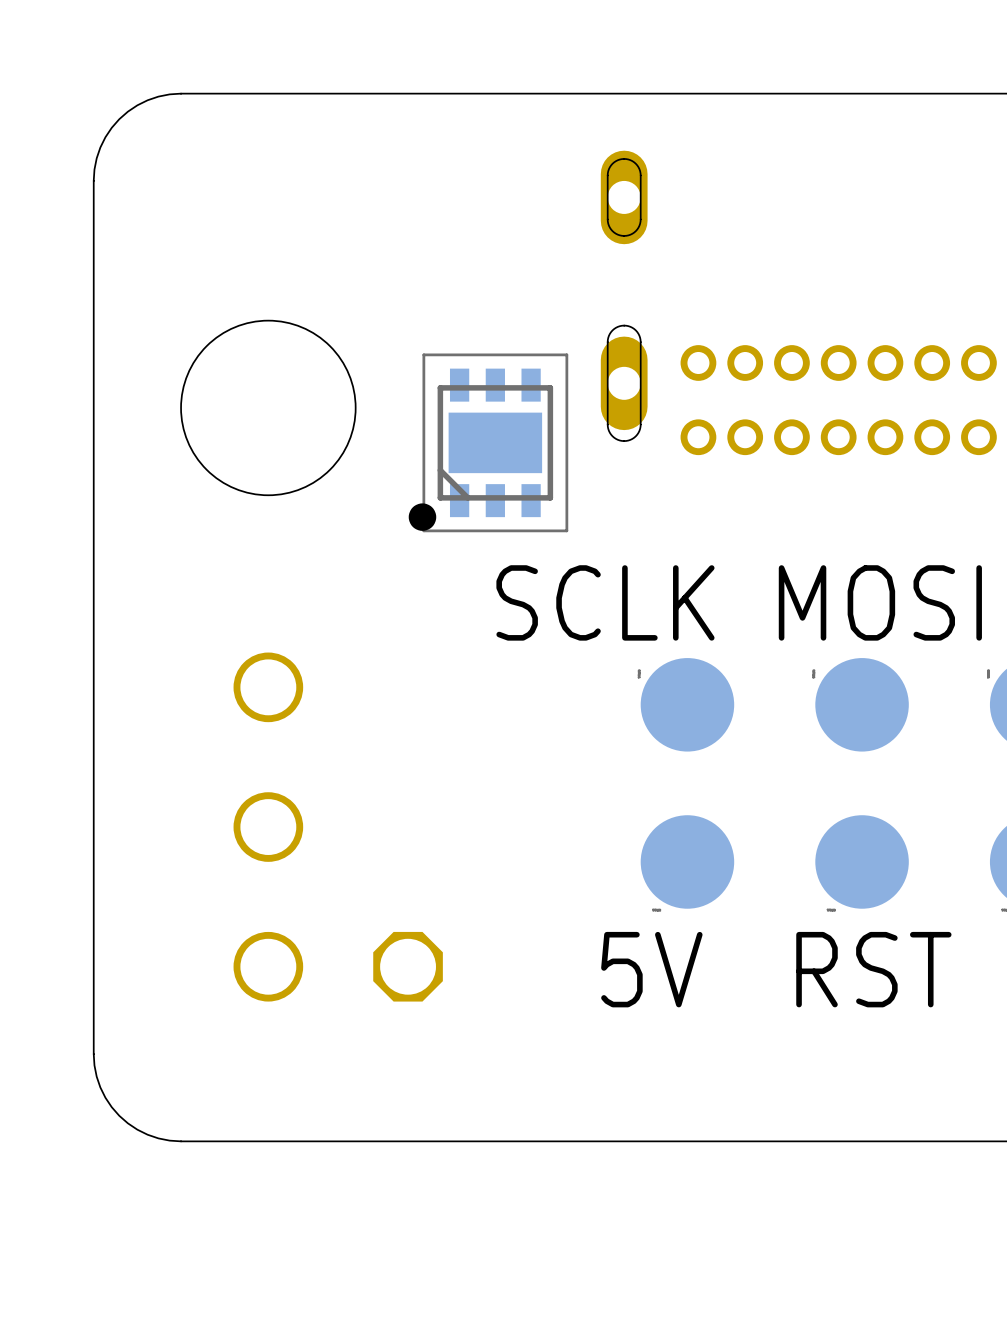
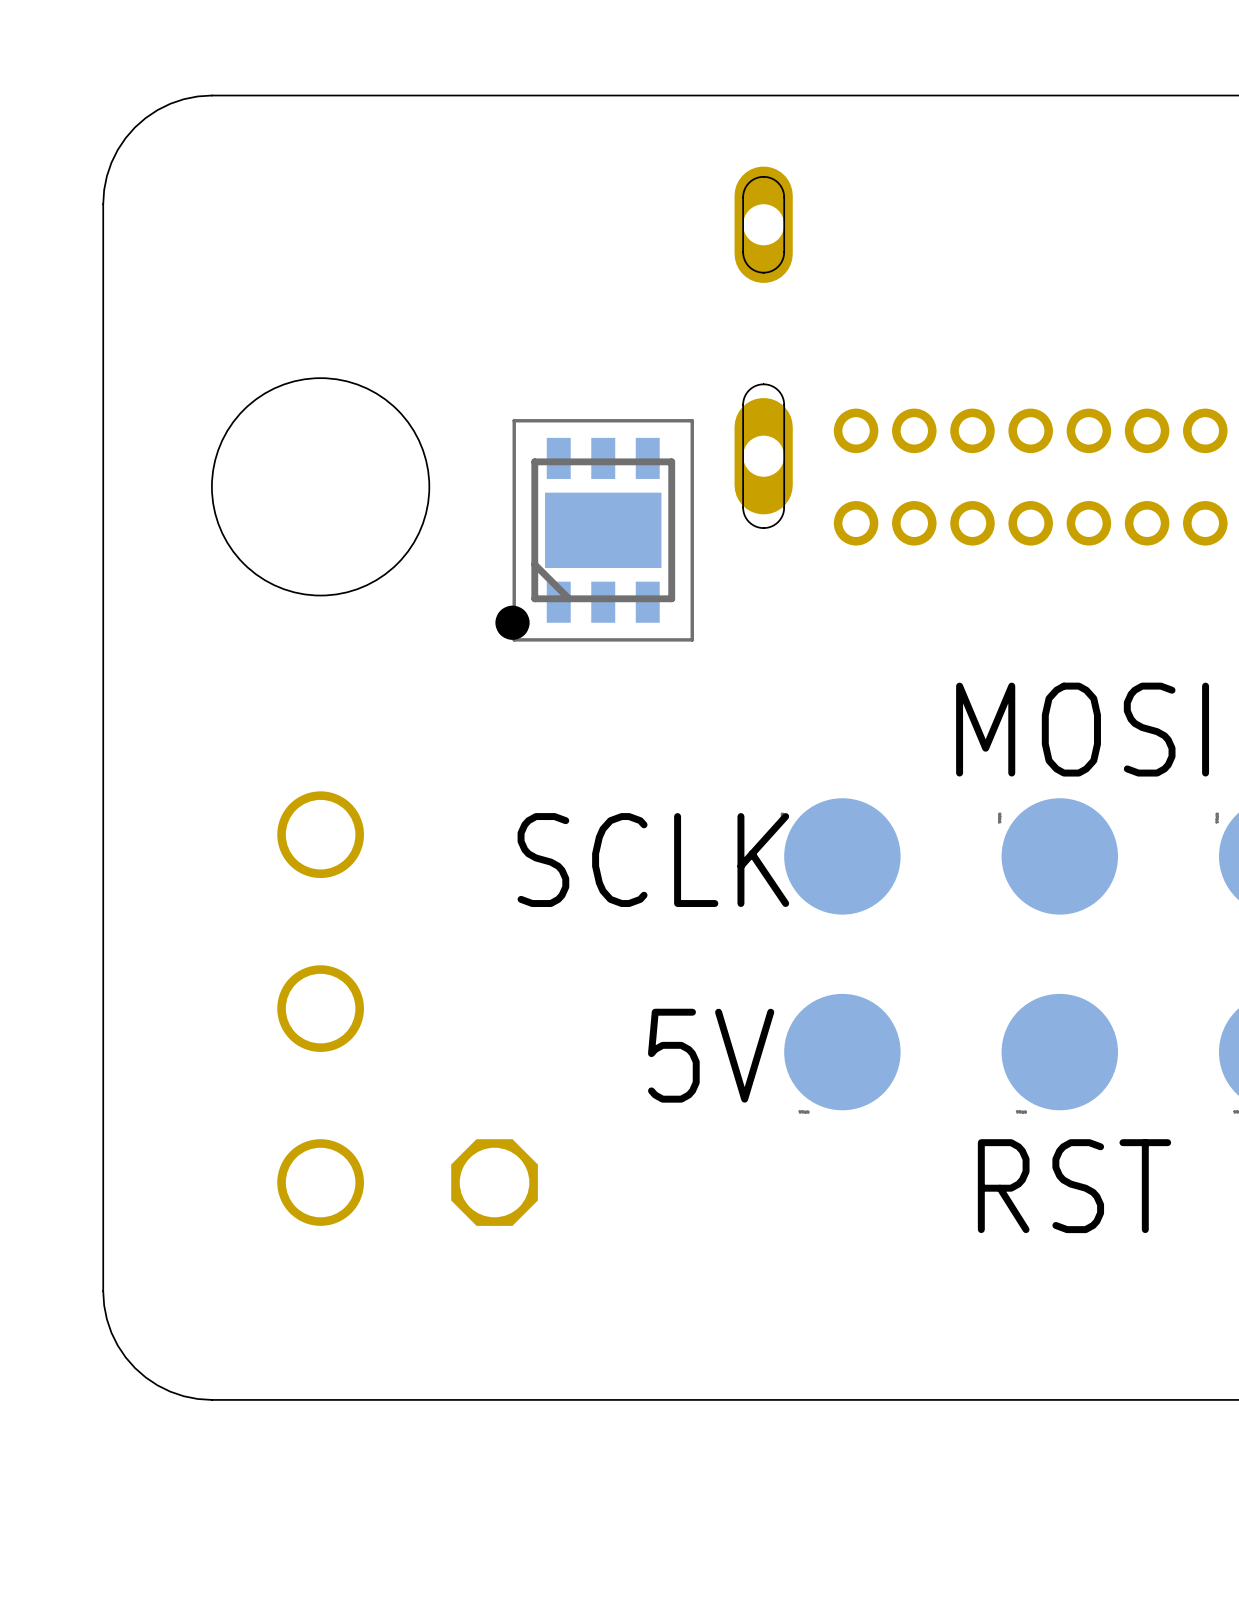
SCLK name position: SCLK (605, 602) -> SCLK (653, 860)
5V name position: 5V (651, 969) -> 5V (711, 1055)

